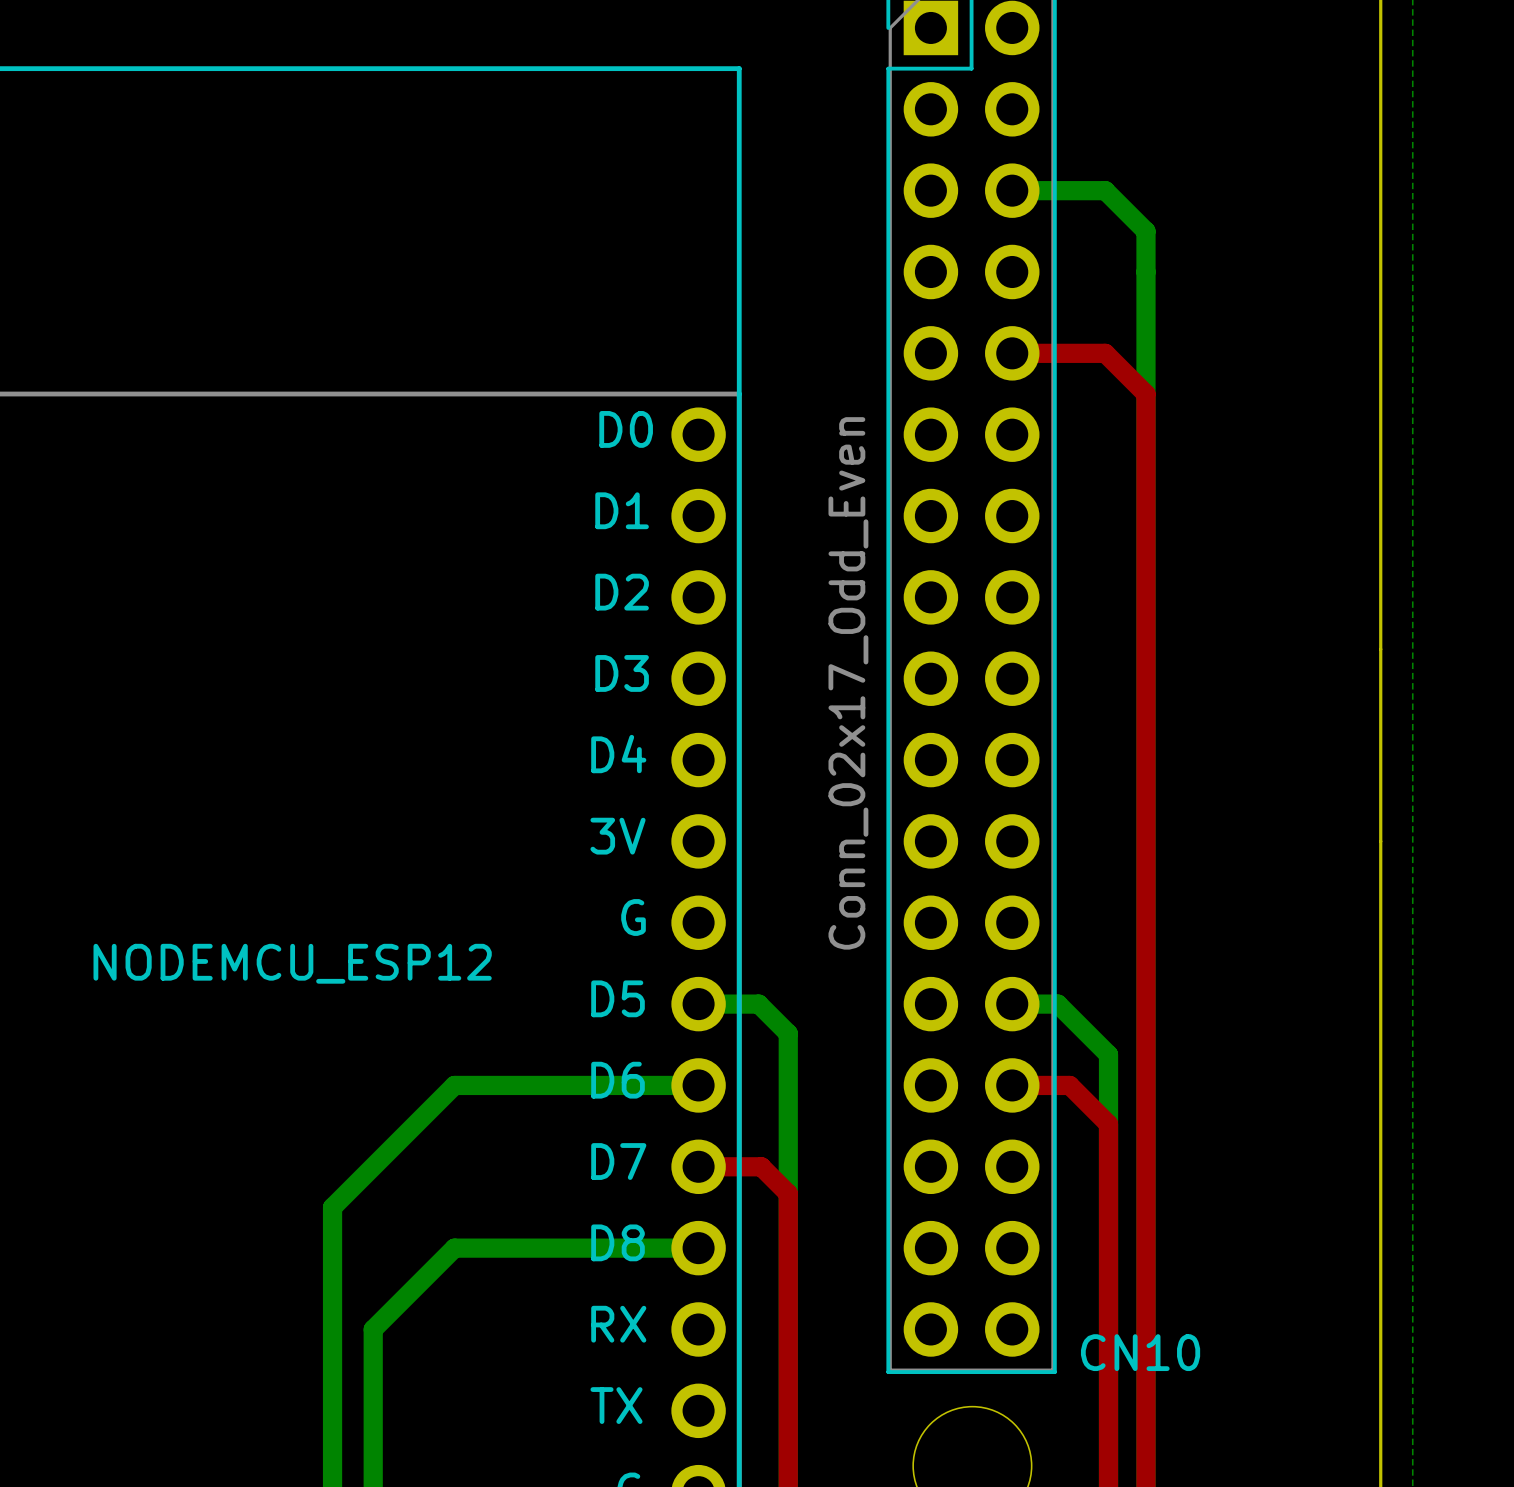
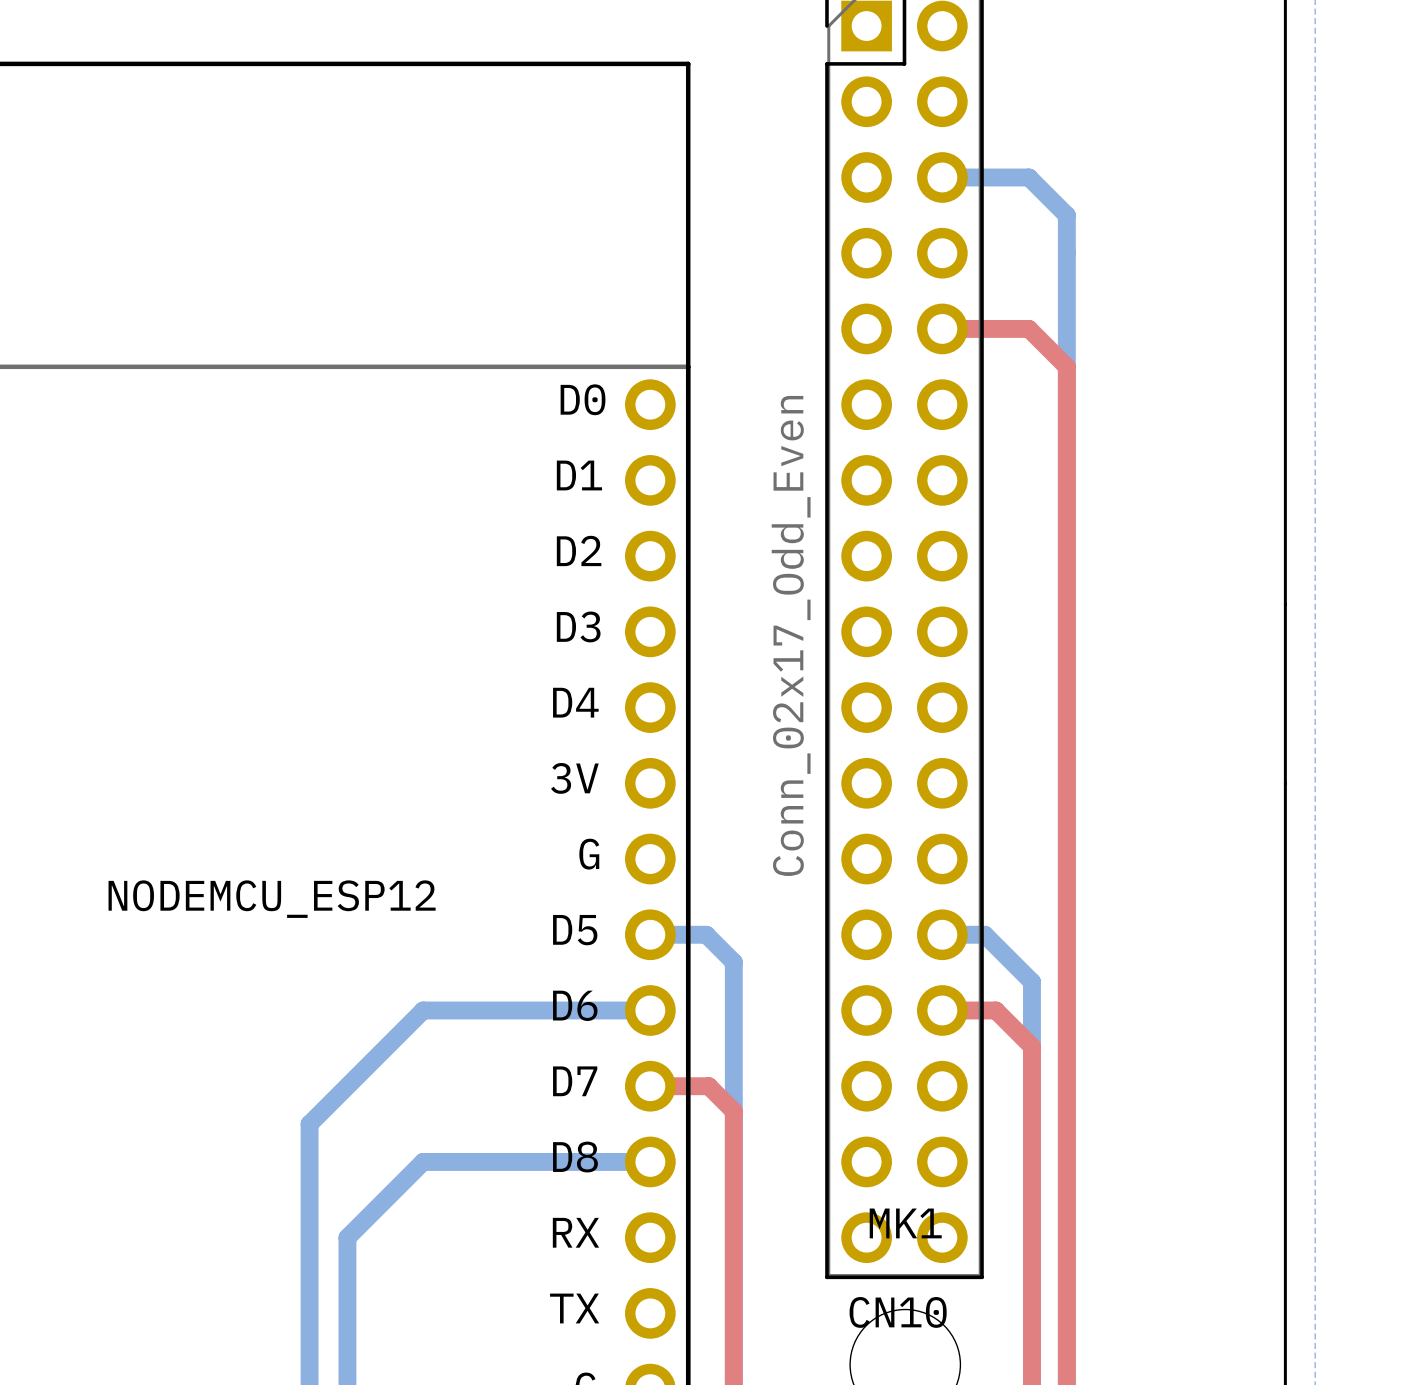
MK1 name: none -> MK1 (905, 1223)
CN10 name position: CN10 (1140, 1352) -> CN10 (898, 1312)

